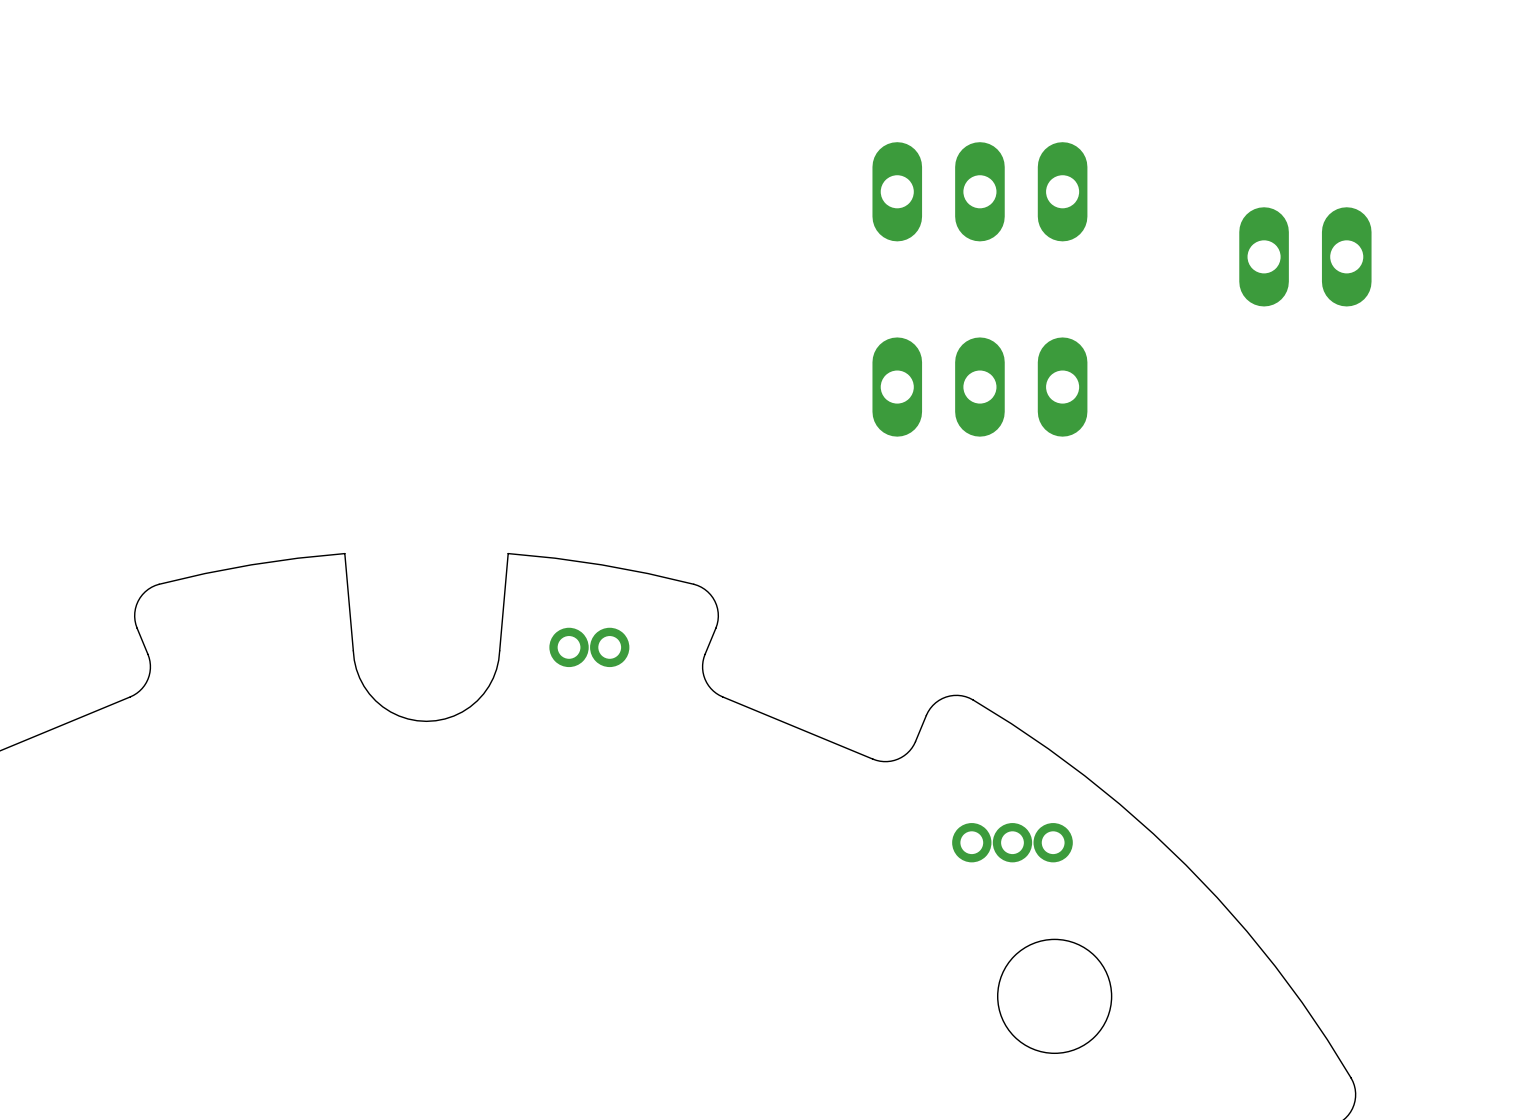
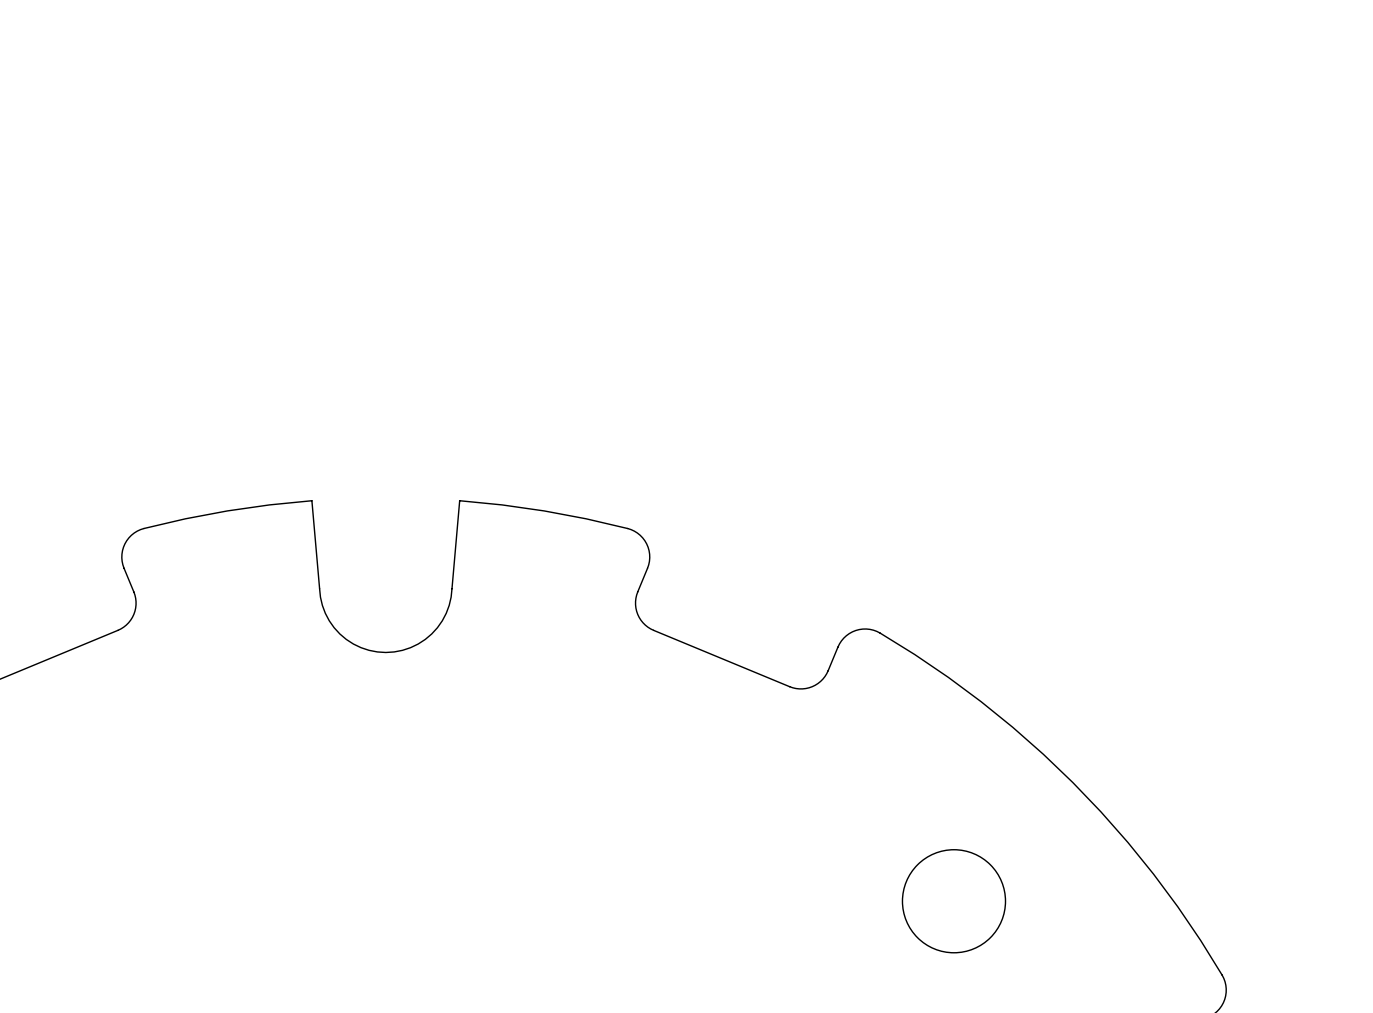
part: (979, 191) -> none
part: (1305, 256) -> none
part: (979, 387) -> none
part: (589, 647) -> none
part: (1012, 842) -> none

